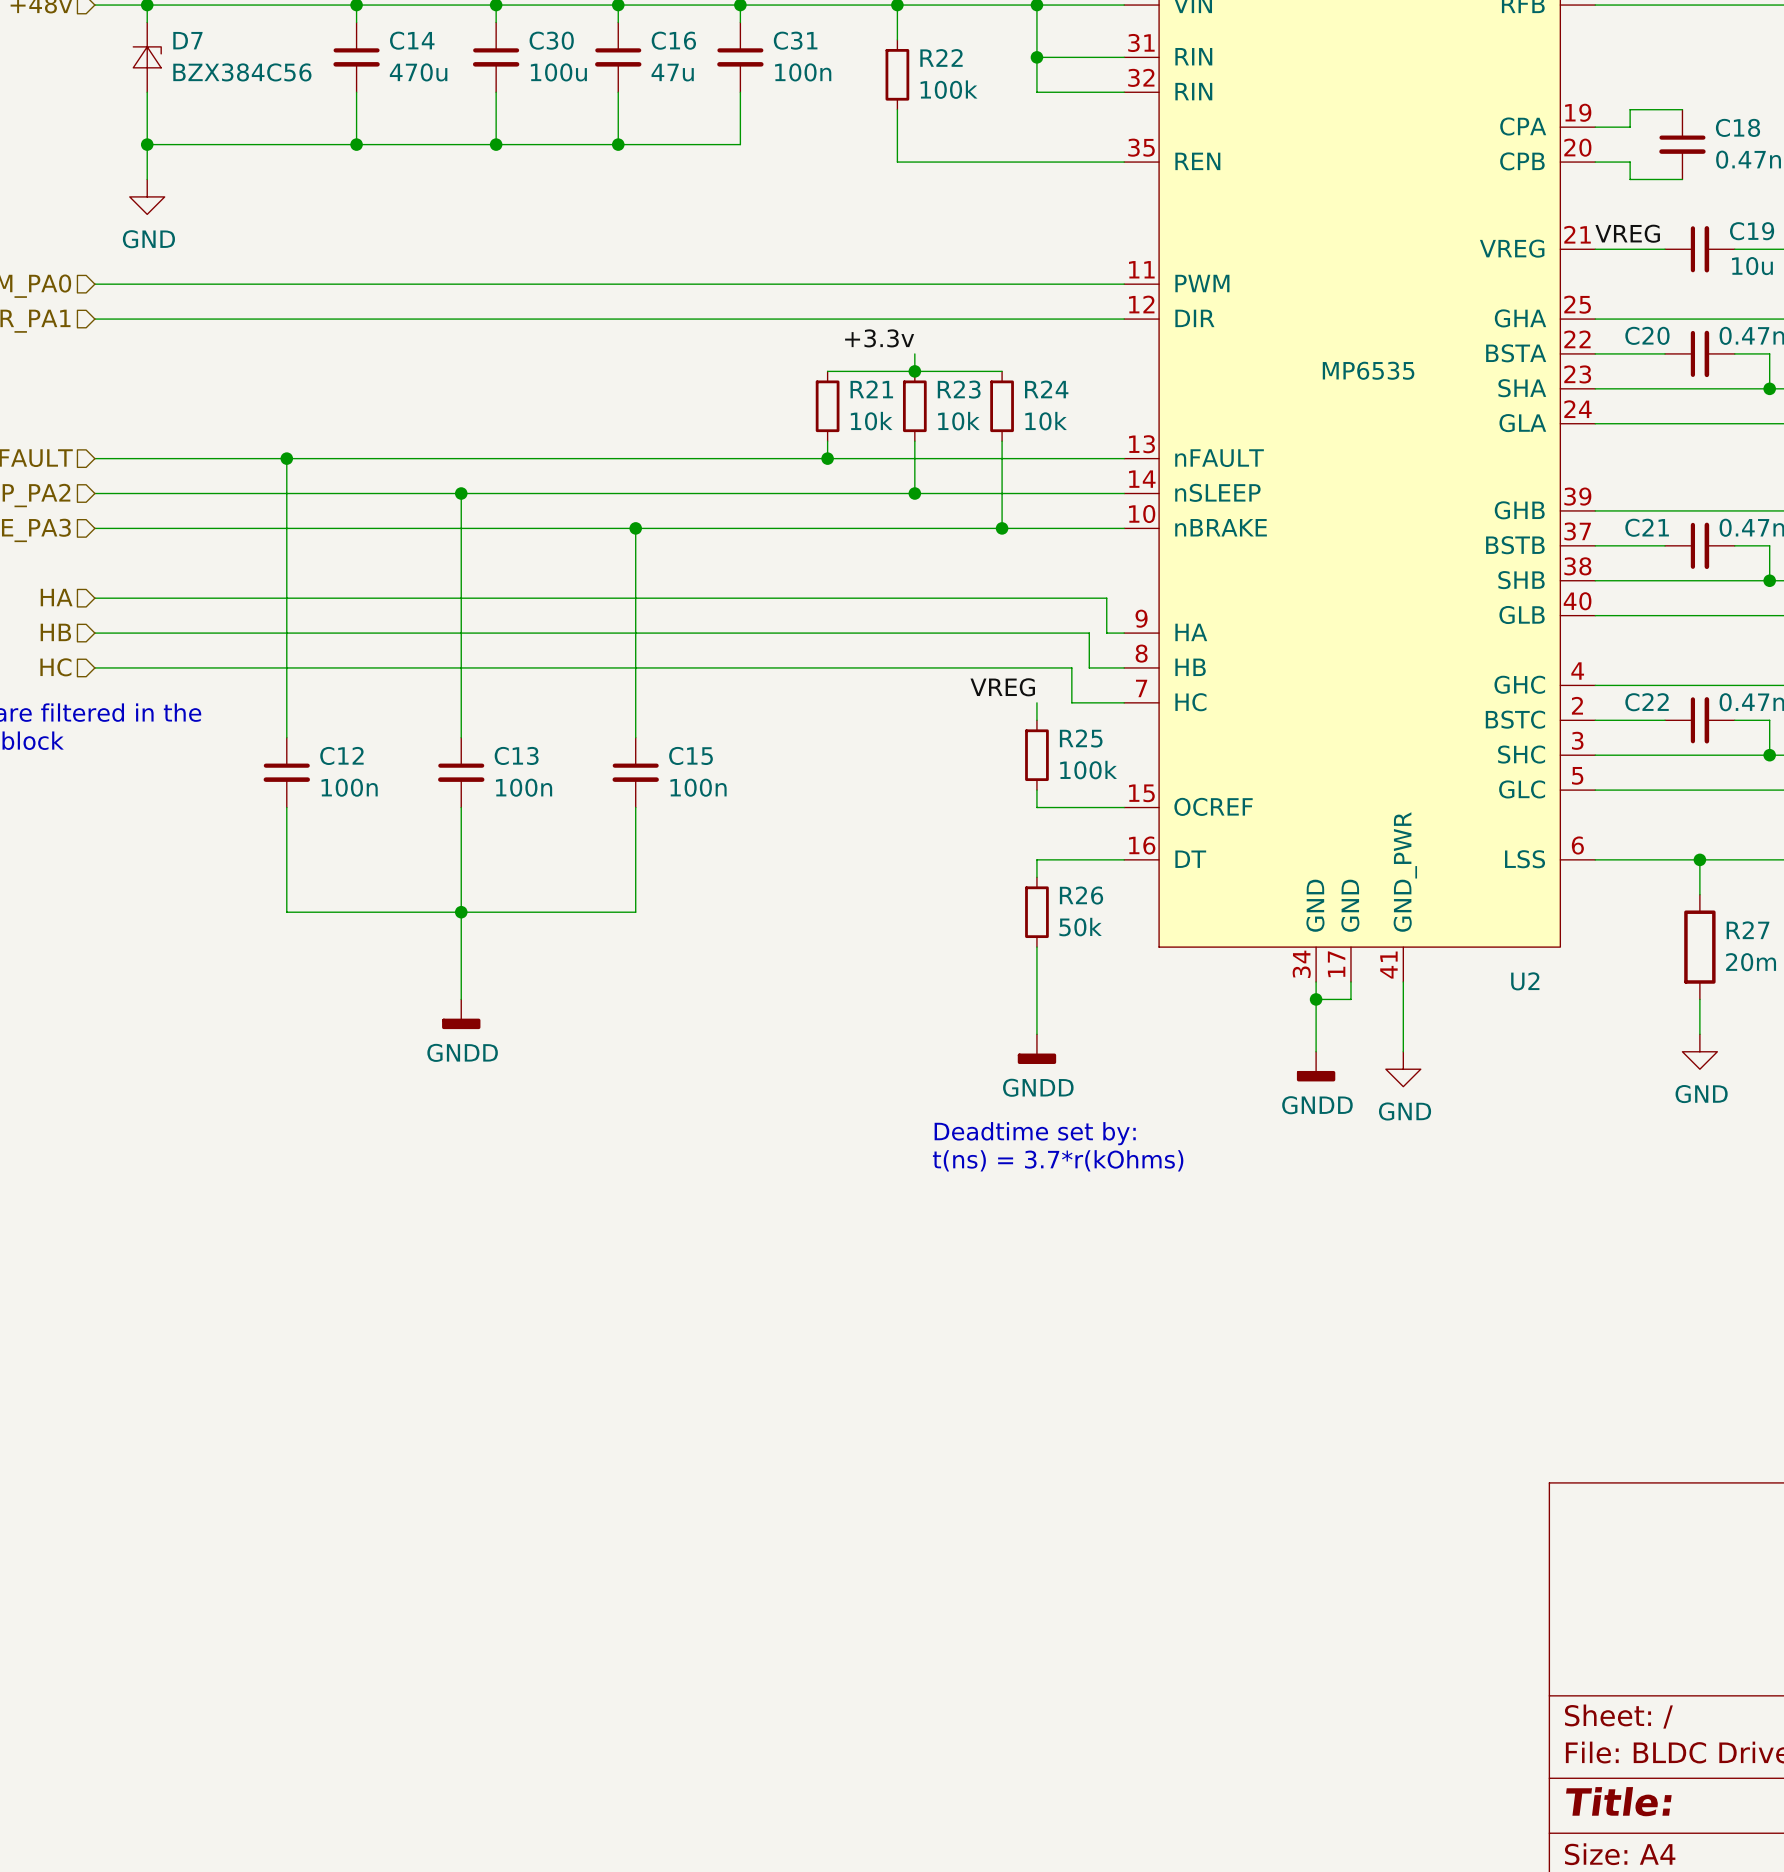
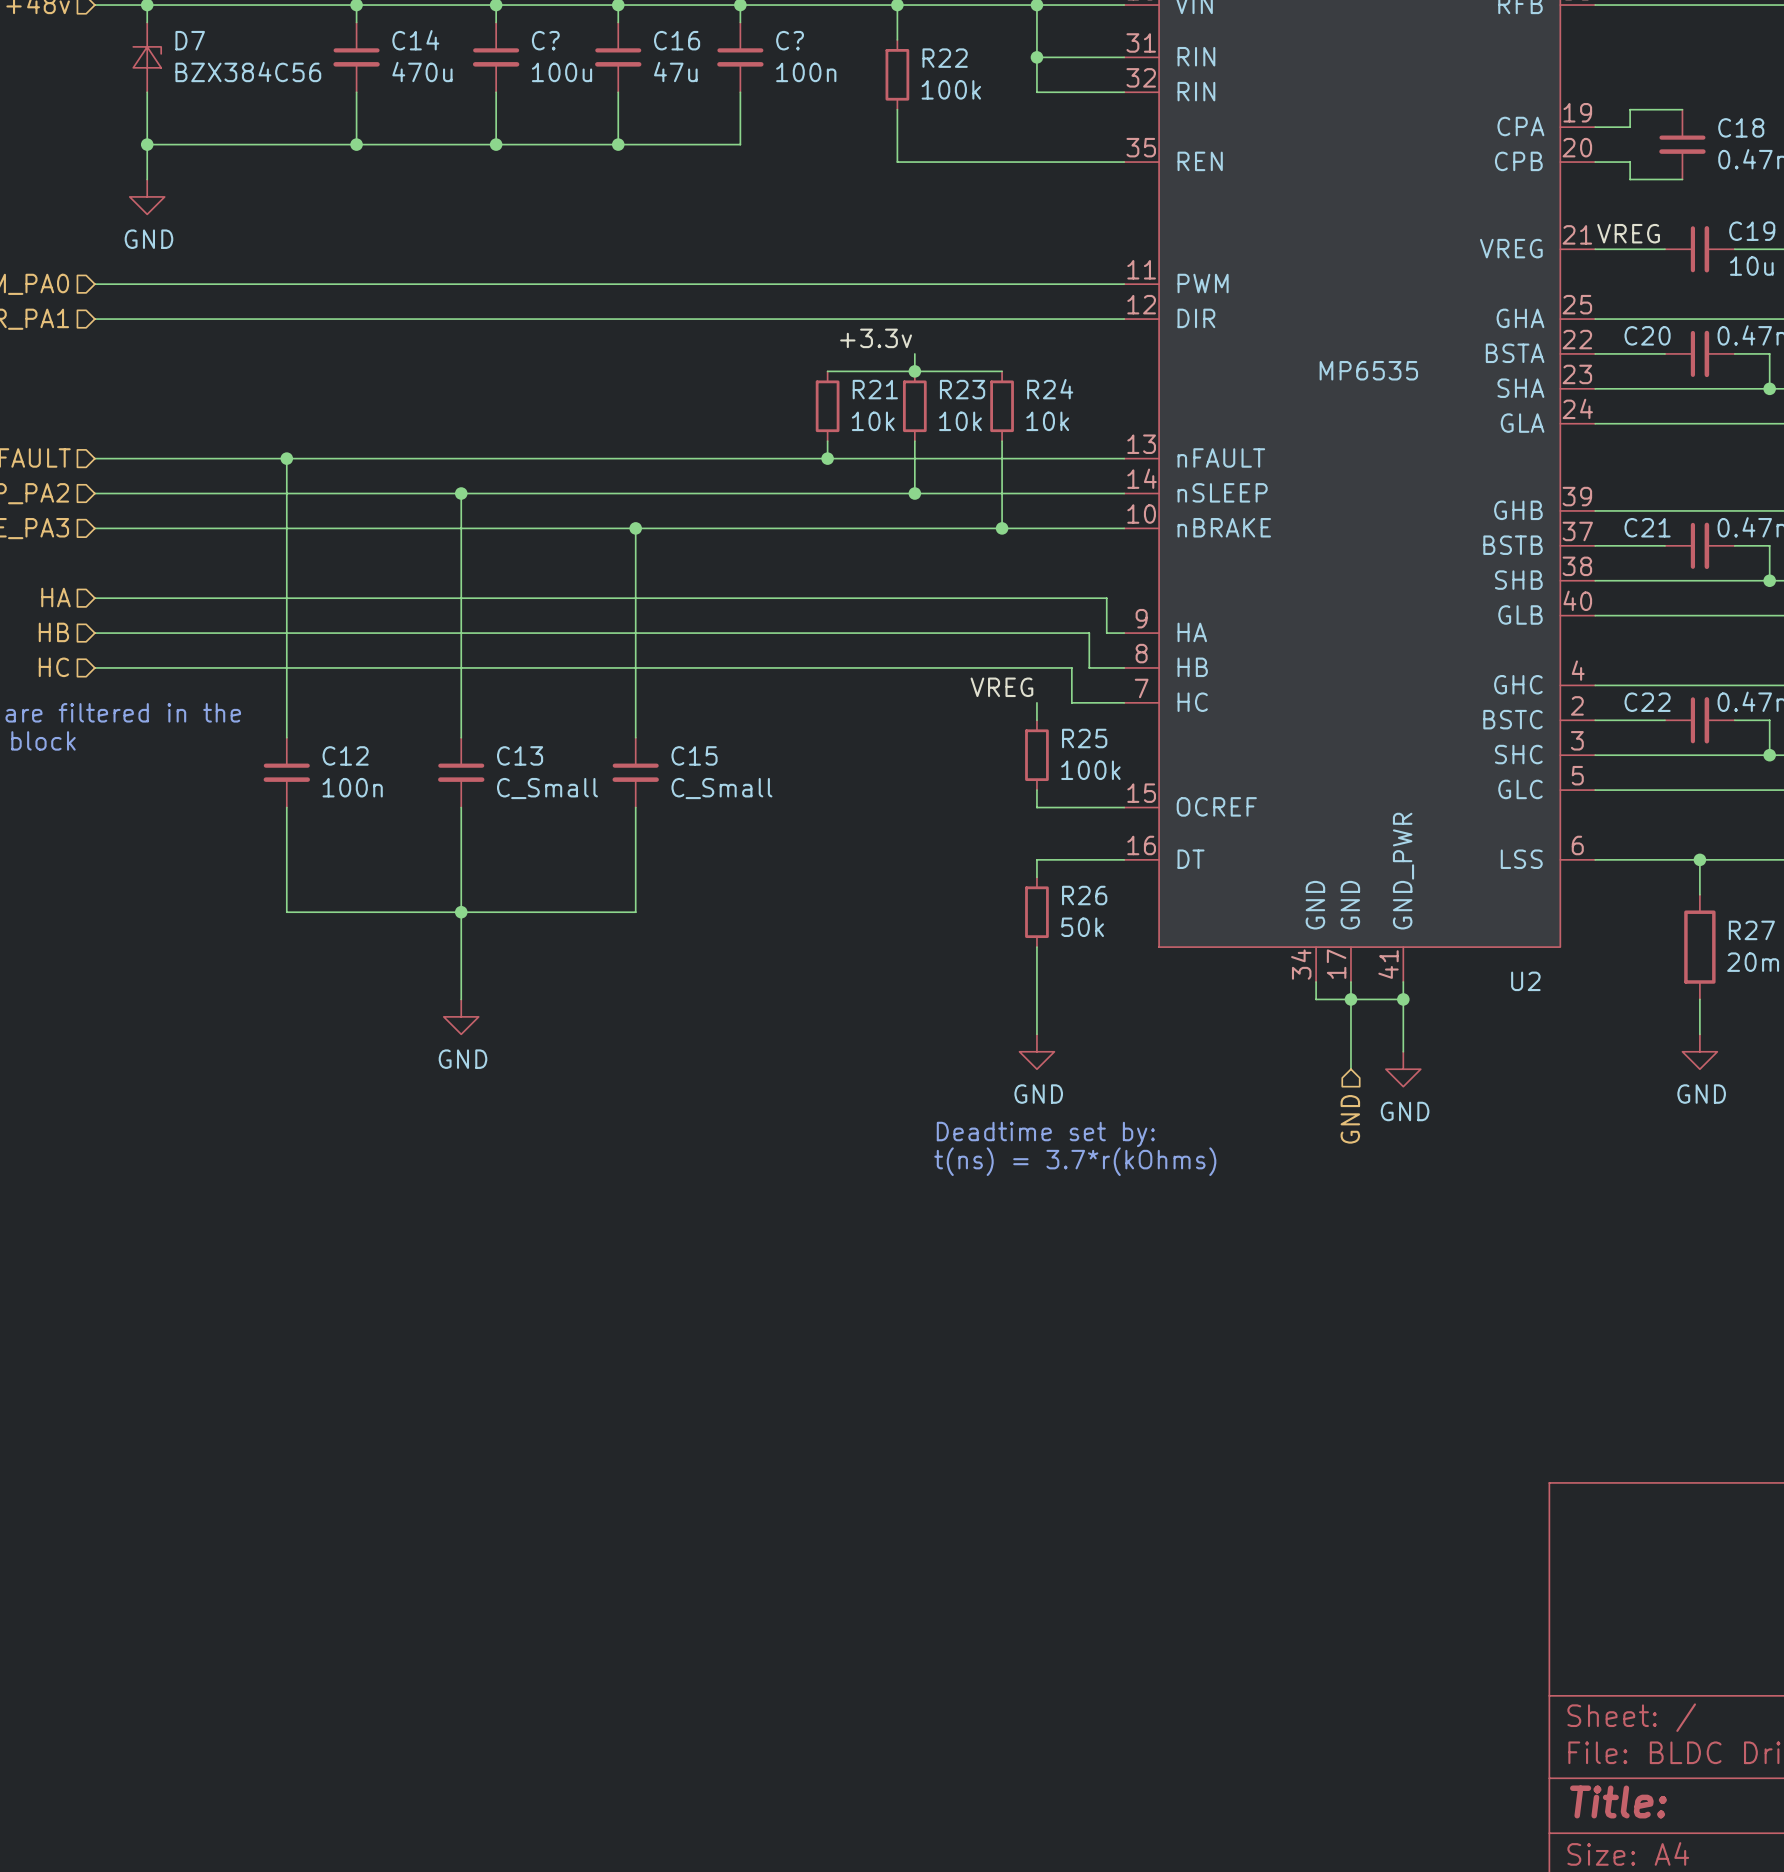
C30 name: C30 (551, 40) -> C? (545, 40)
C31 name: C31 (795, 40) -> C? (790, 40)
C13 value: 100n (524, 787) -> C_Small (547, 788)
C15 value: 100n (698, 787) -> C_Small (721, 788)
wire: (1316, 999) (1316, 1051) -> none
junction position: (1316, 999) -> (1350, 999)
wire: none -> (1403, 999) (1350, 999) (1350, 1069)
junction: none -> (1403, 999)
power symbol: GNDD (461, 1014) -> GND (461, 1016)
power symbol: GNDD (1036, 1049) -> GND (1036, 1051)
power symbol: GNDD (1316, 1066) -> none
hierarchical label: none -> GND (1350, 1119)

